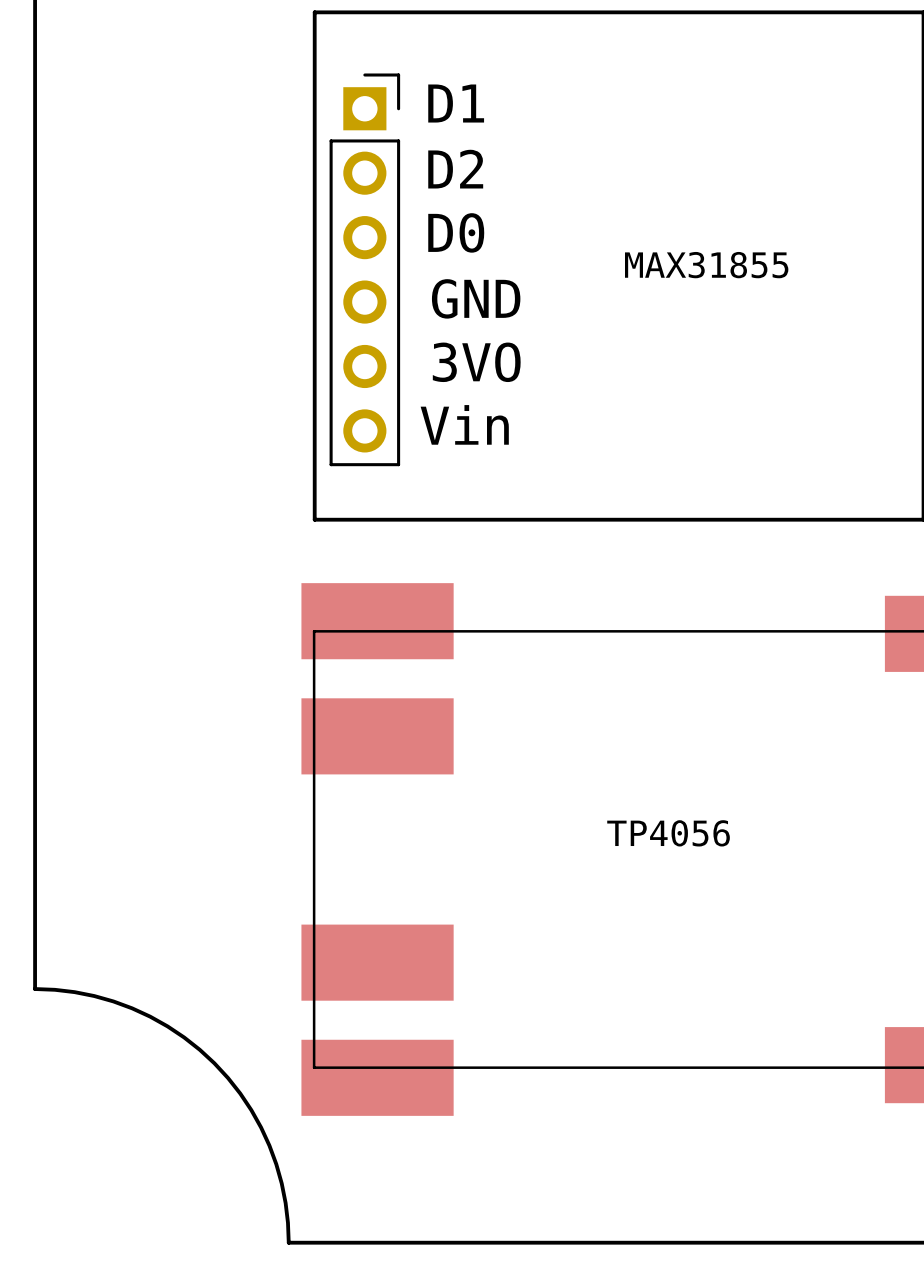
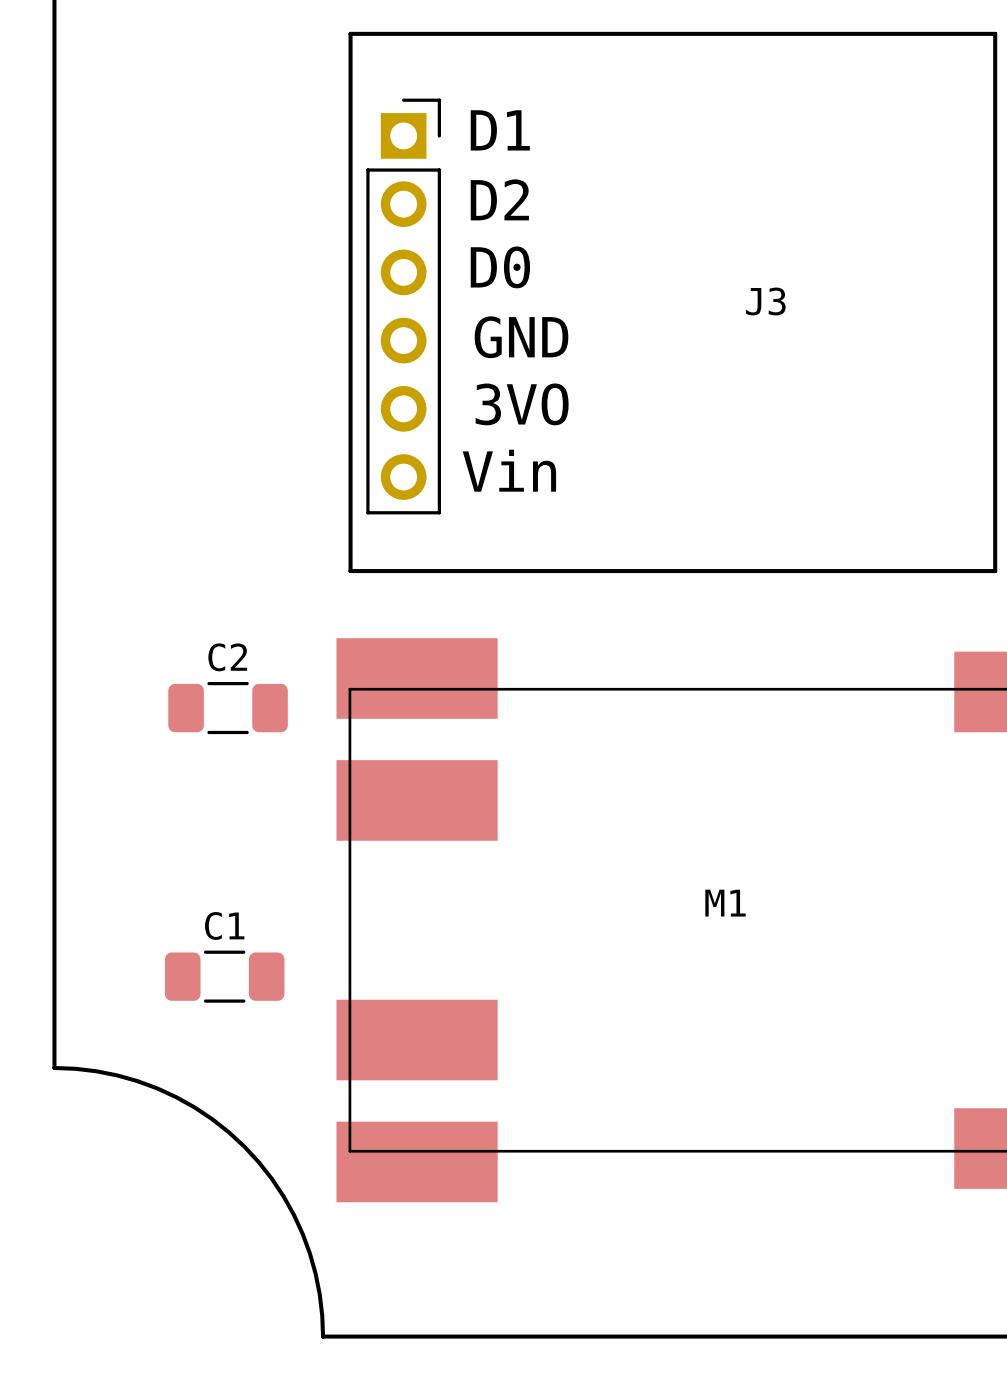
MAX31855 name: MAX31855 (706, 265) -> J3 (765, 301)
C2: none -> (228, 708)
TP4056 name: TP4056 (668, 833) -> M1 (725, 903)
C1: none -> (224, 976)

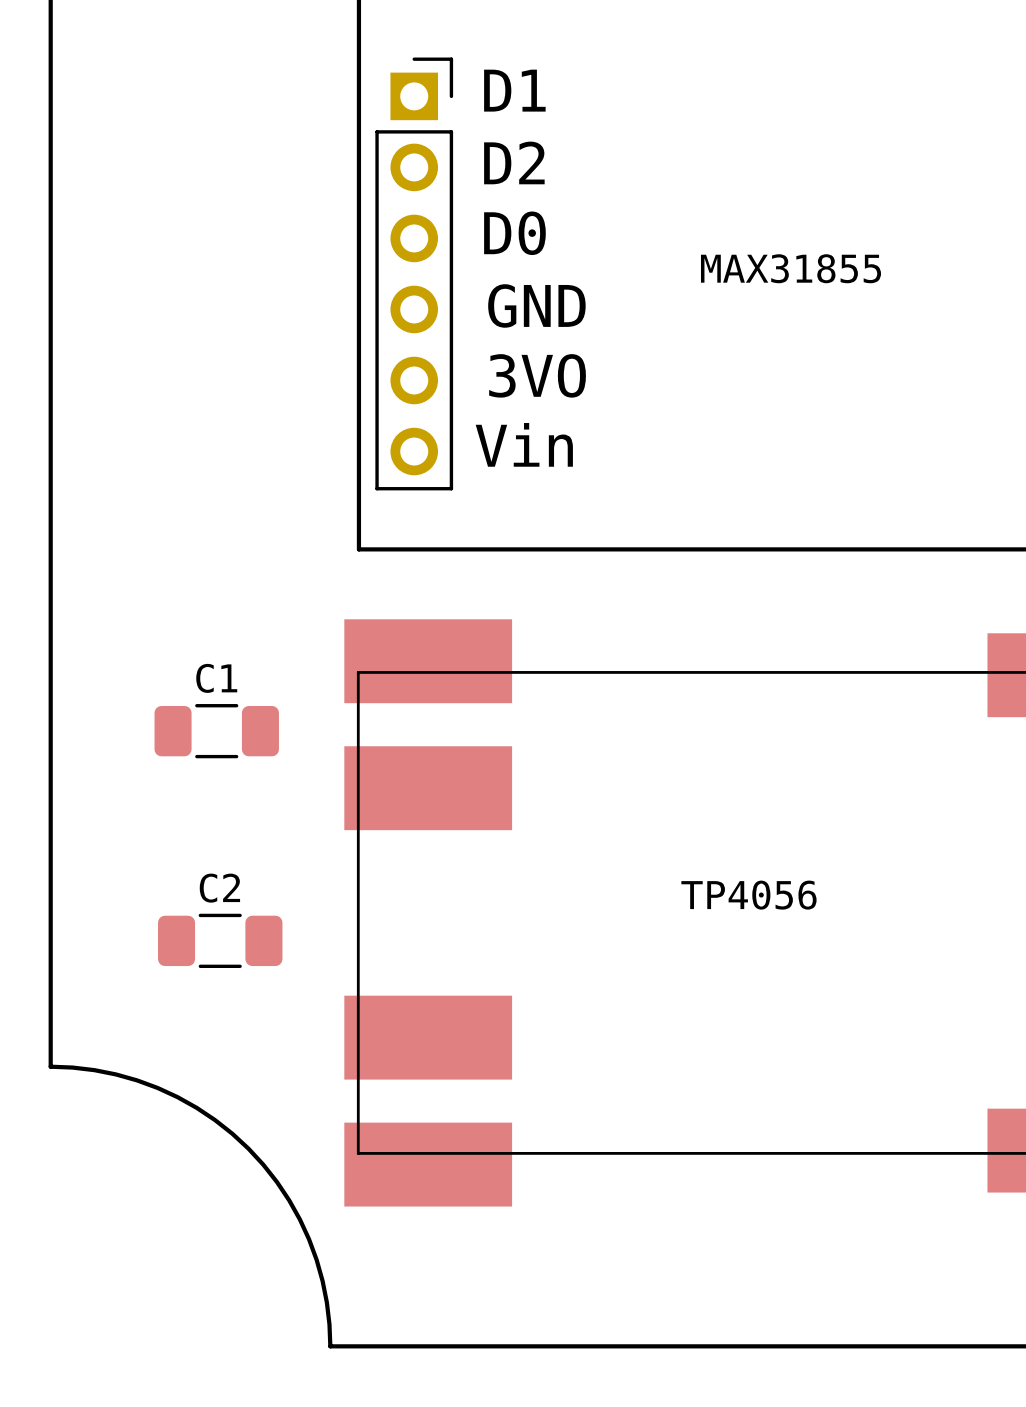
J3 name: J3 (765, 301) -> MAX31855 (791, 268)
C2 position: (228, 708) -> (220, 940)
M1 name: M1 (725, 903) -> TP4056 (748, 895)
C1 position: (224, 976) -> (216, 731)

